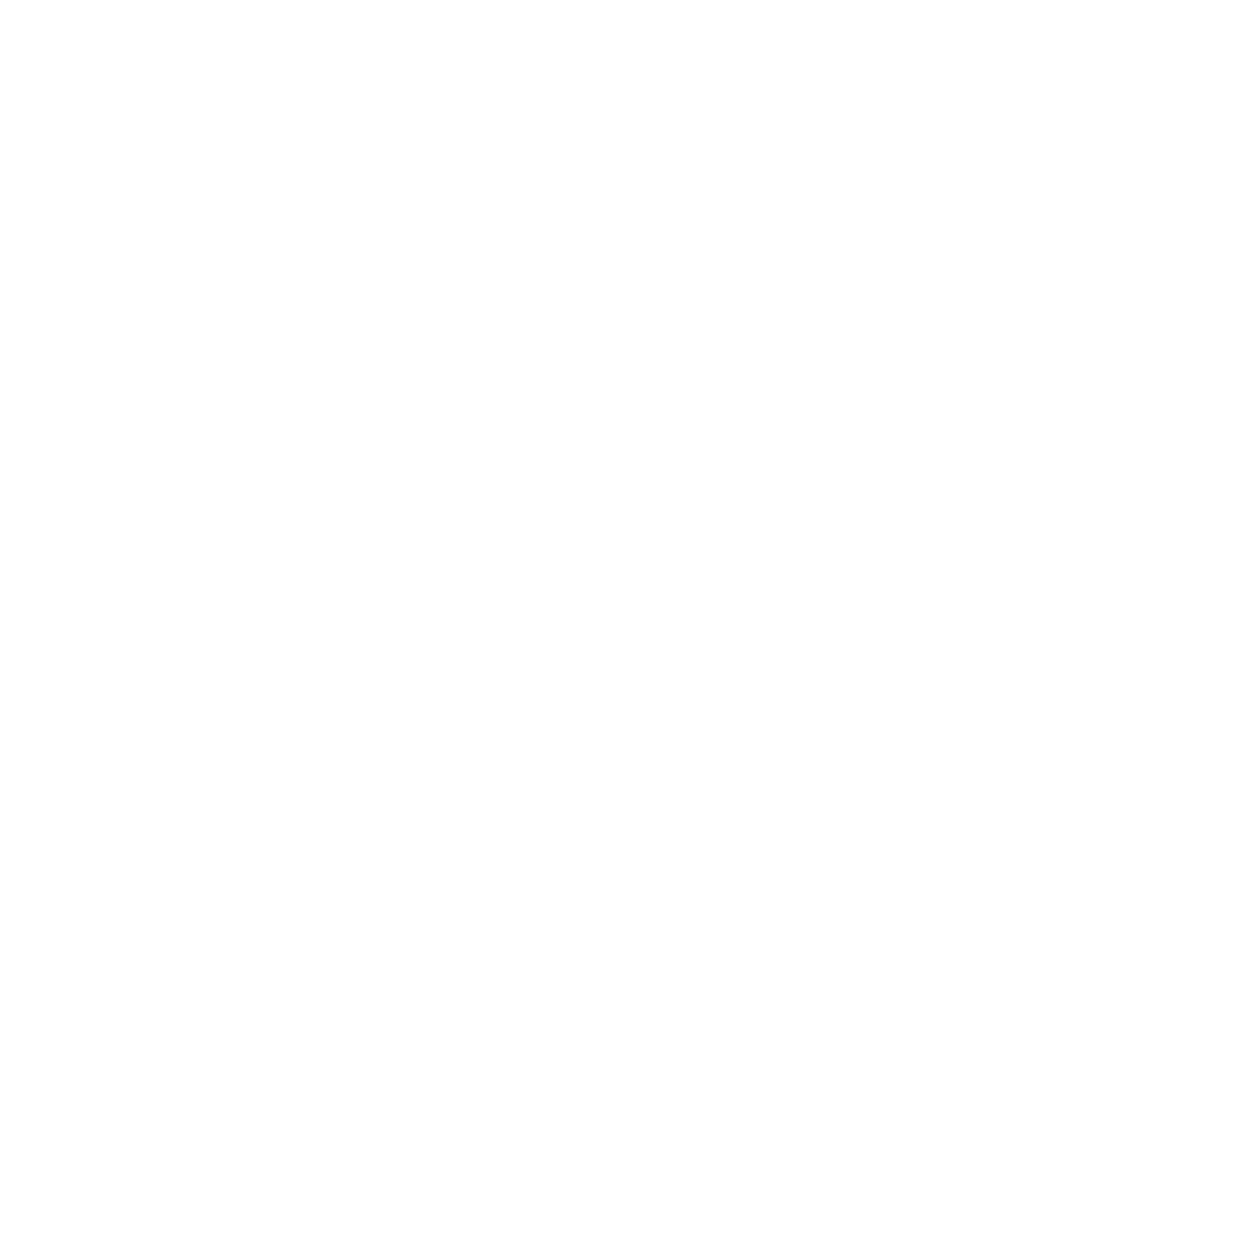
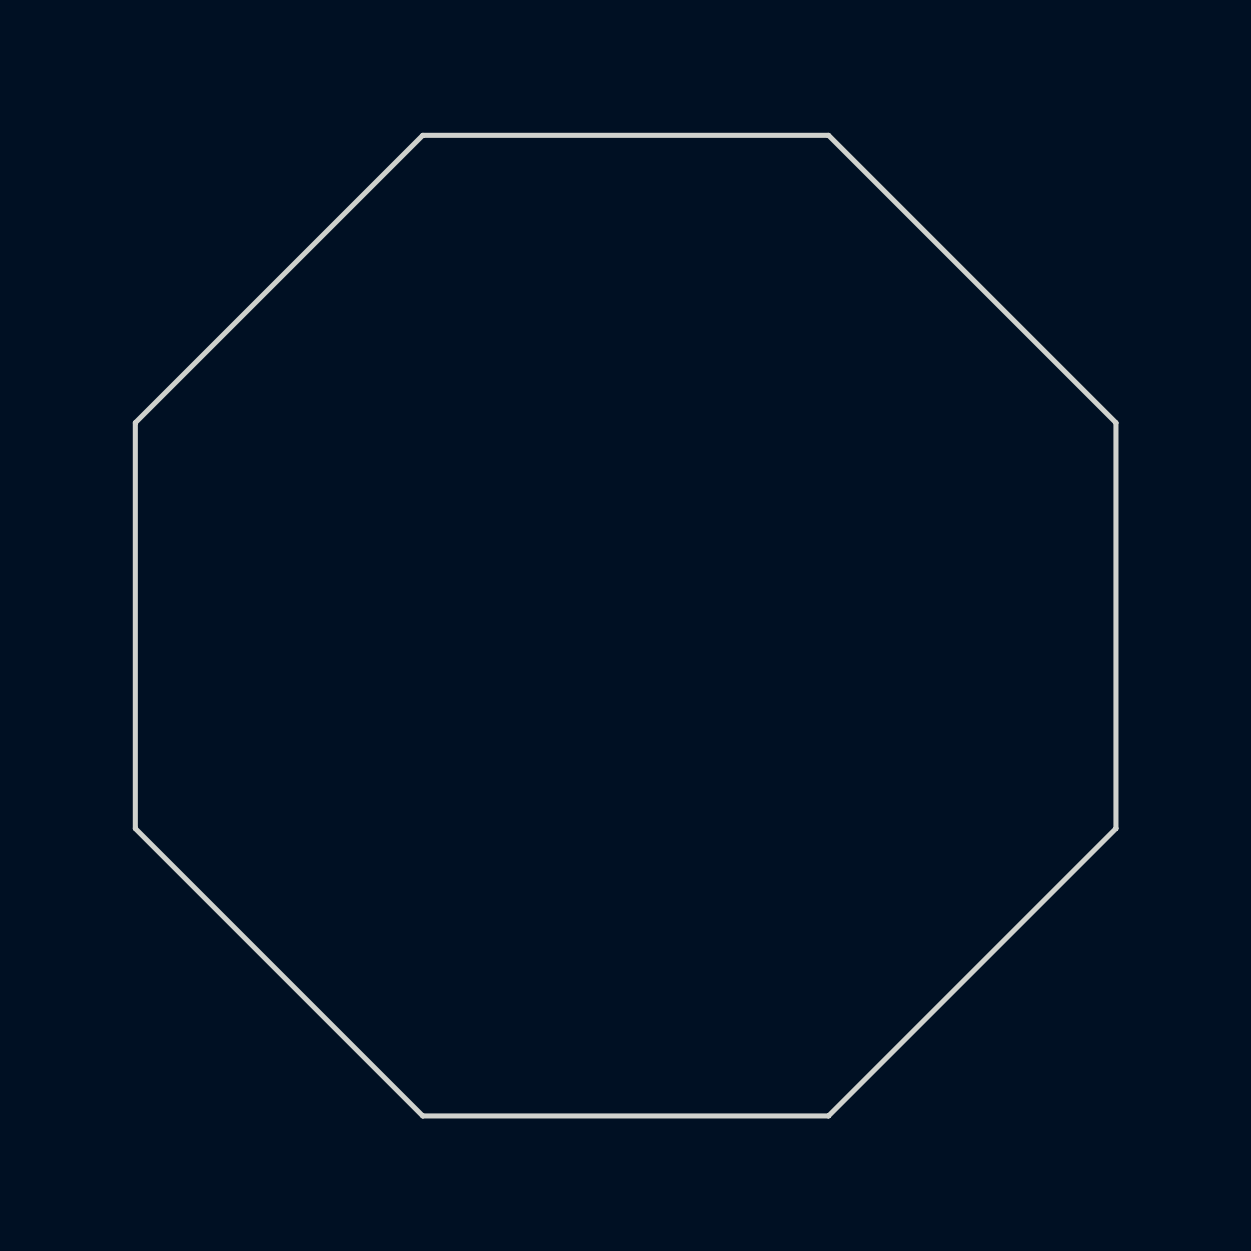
board edge: none -> (422, 135) (828, 135) (1115, 422) (1115, 828) (828, 1115) (422, 1115) (135, 828) (135, 422) (422, 135)

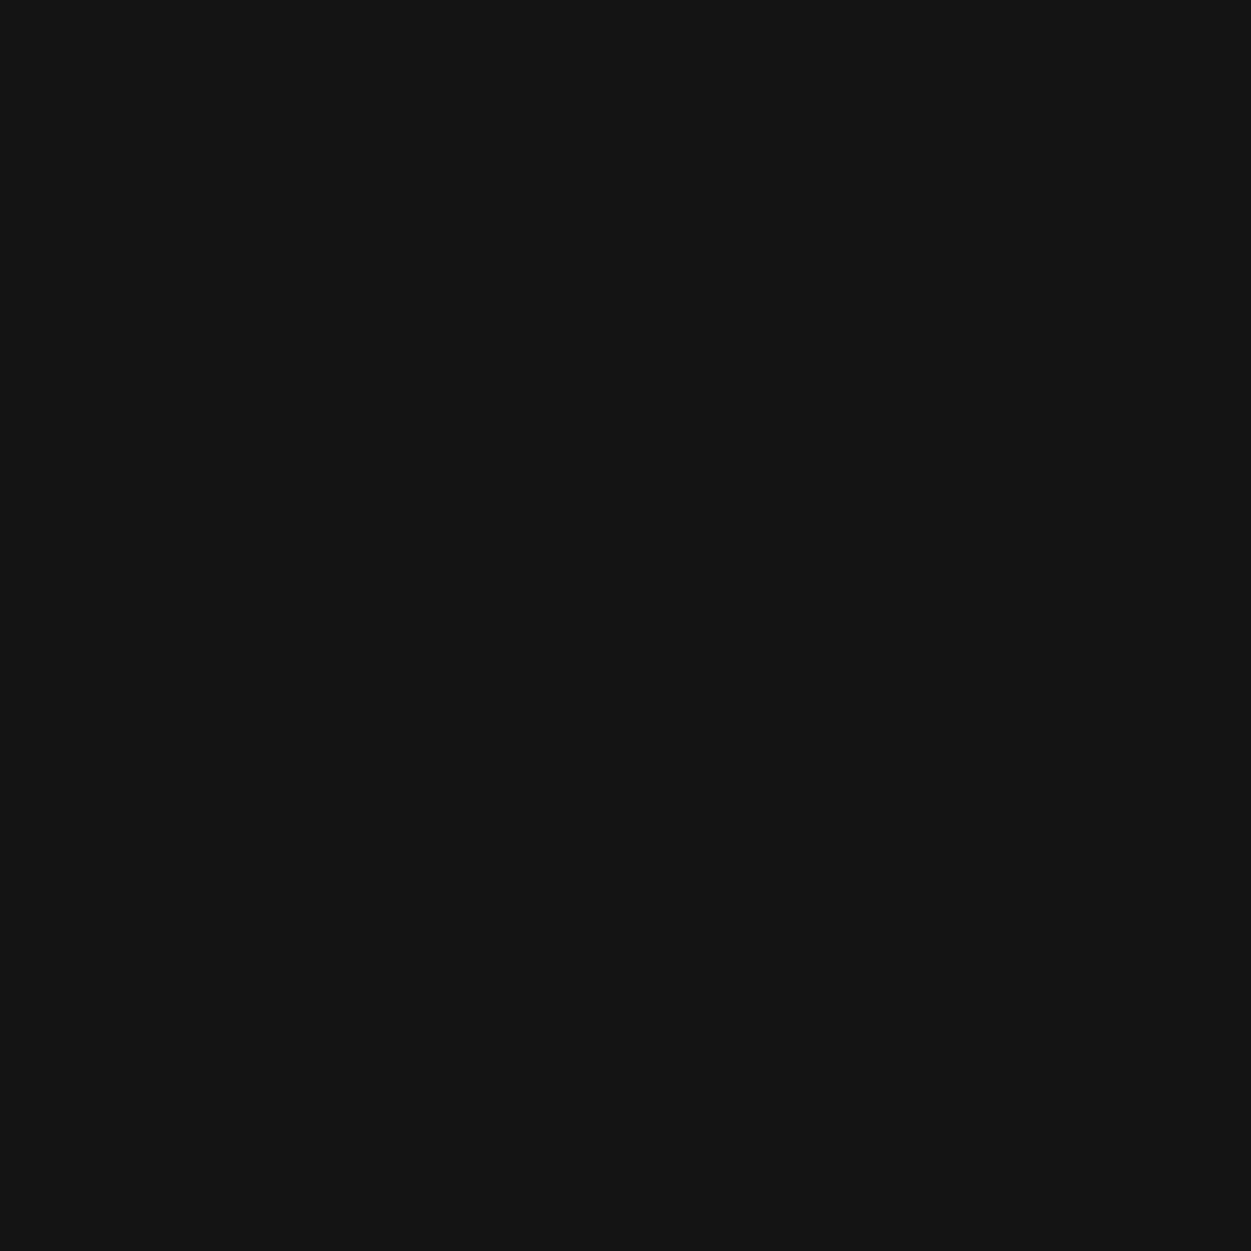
board edge: (422, 135) (828, 135) (1115, 422) (1115, 828) (828, 1115) (422, 1115) (135, 828) (135, 422) (422, 135) -> none

